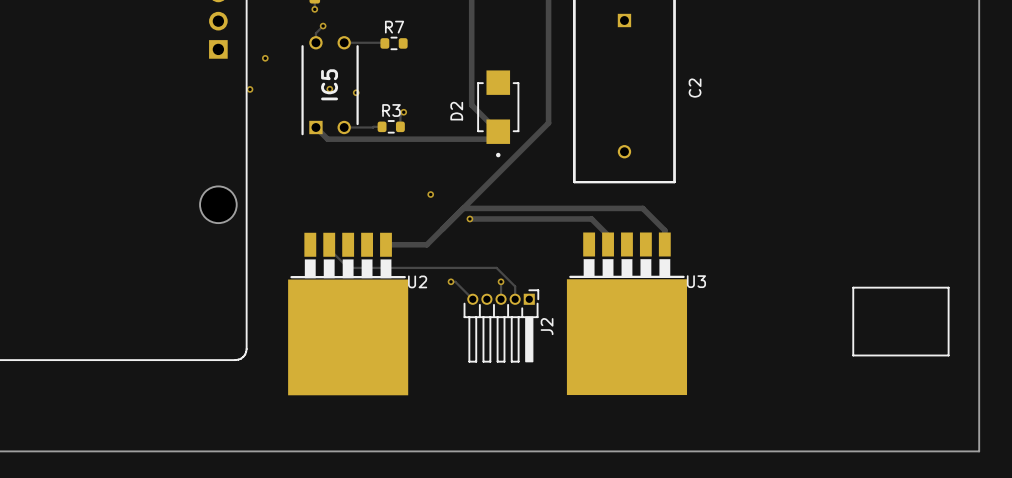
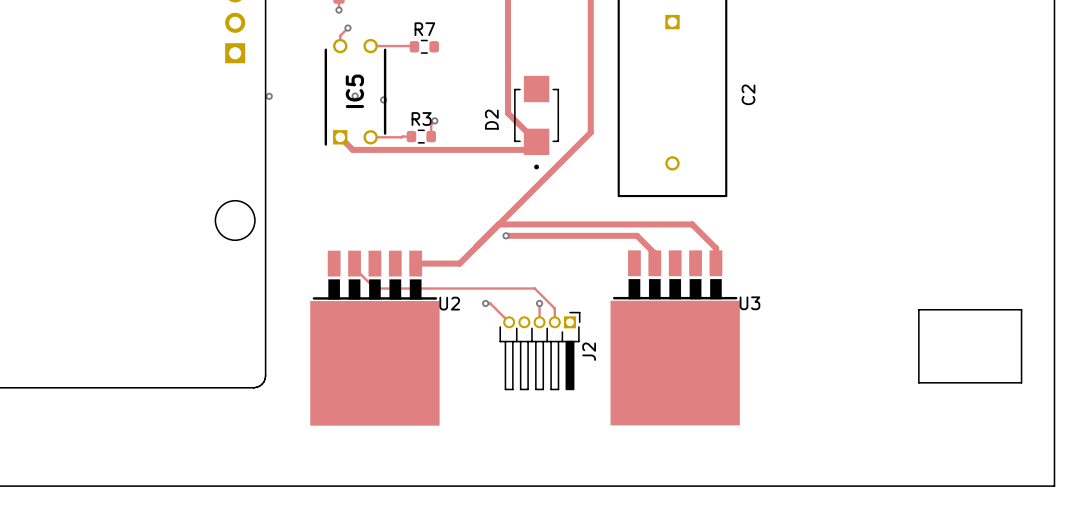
via: (265, 58) -> none
via: (430, 194) -> none

